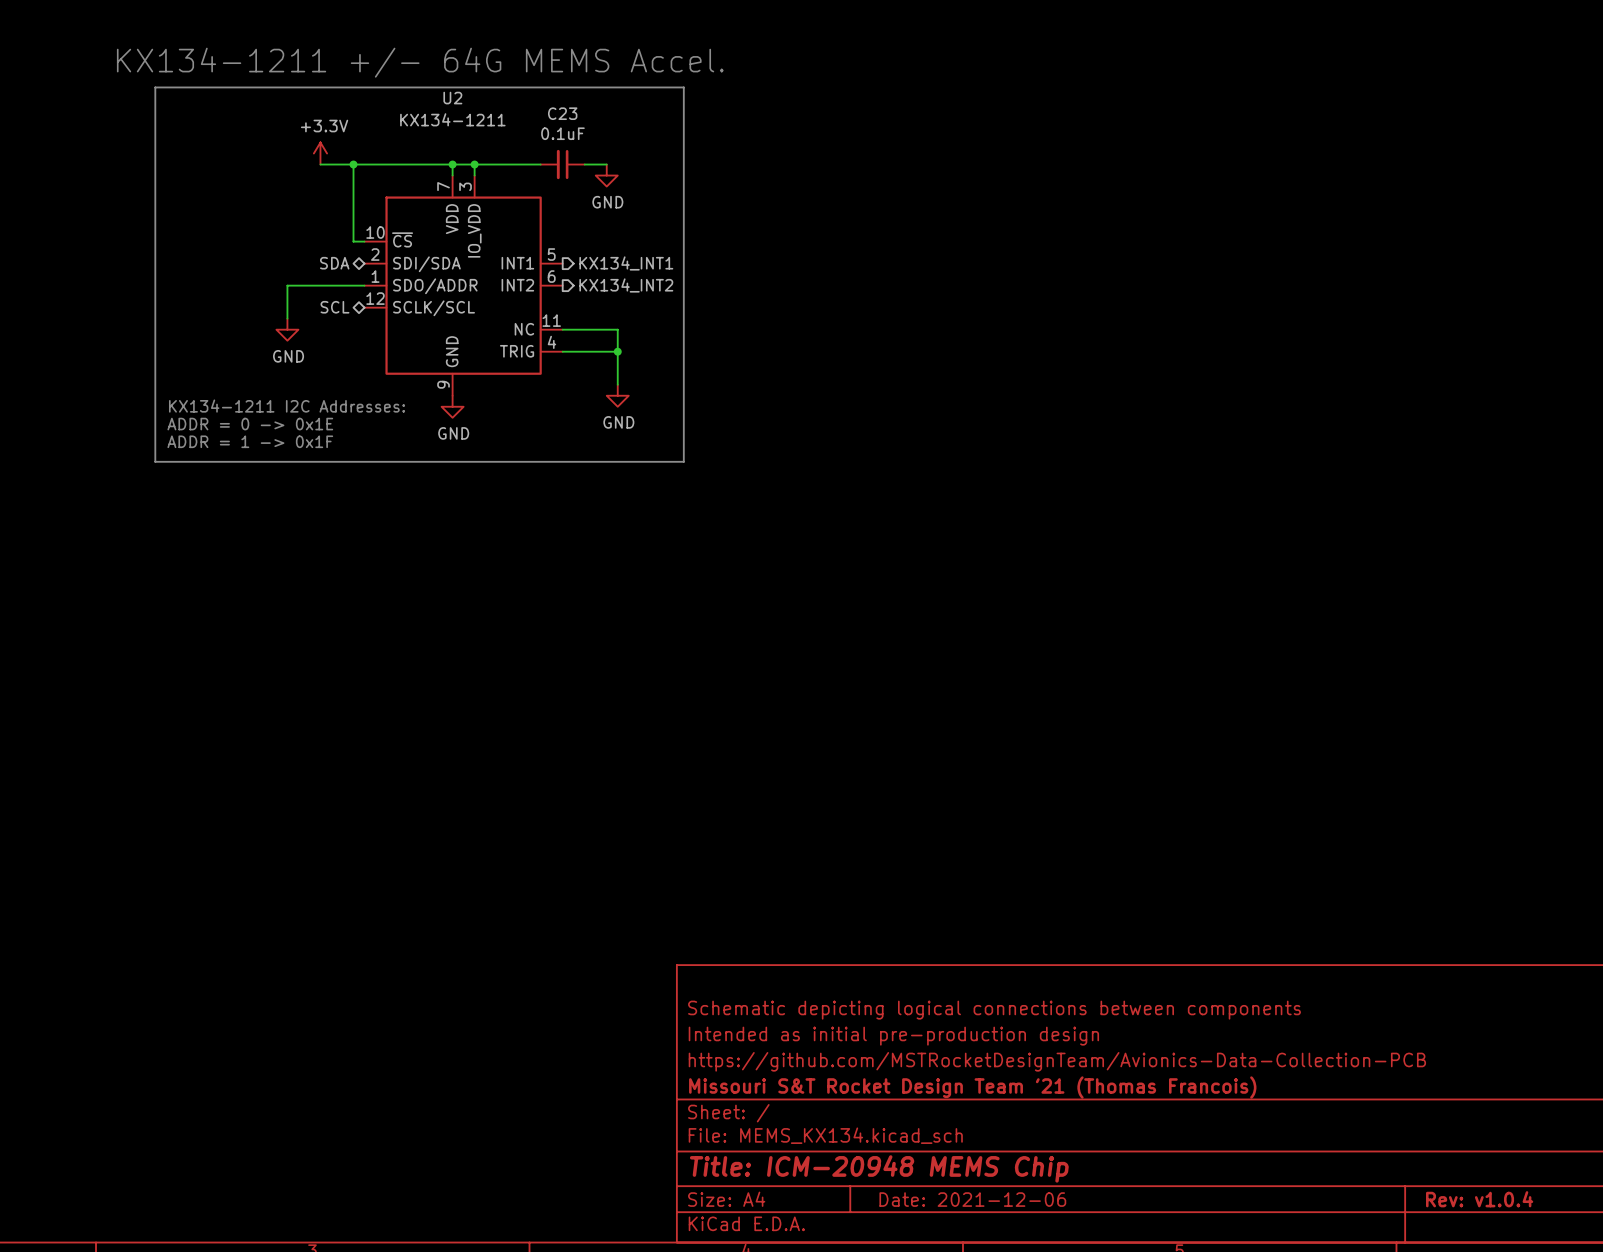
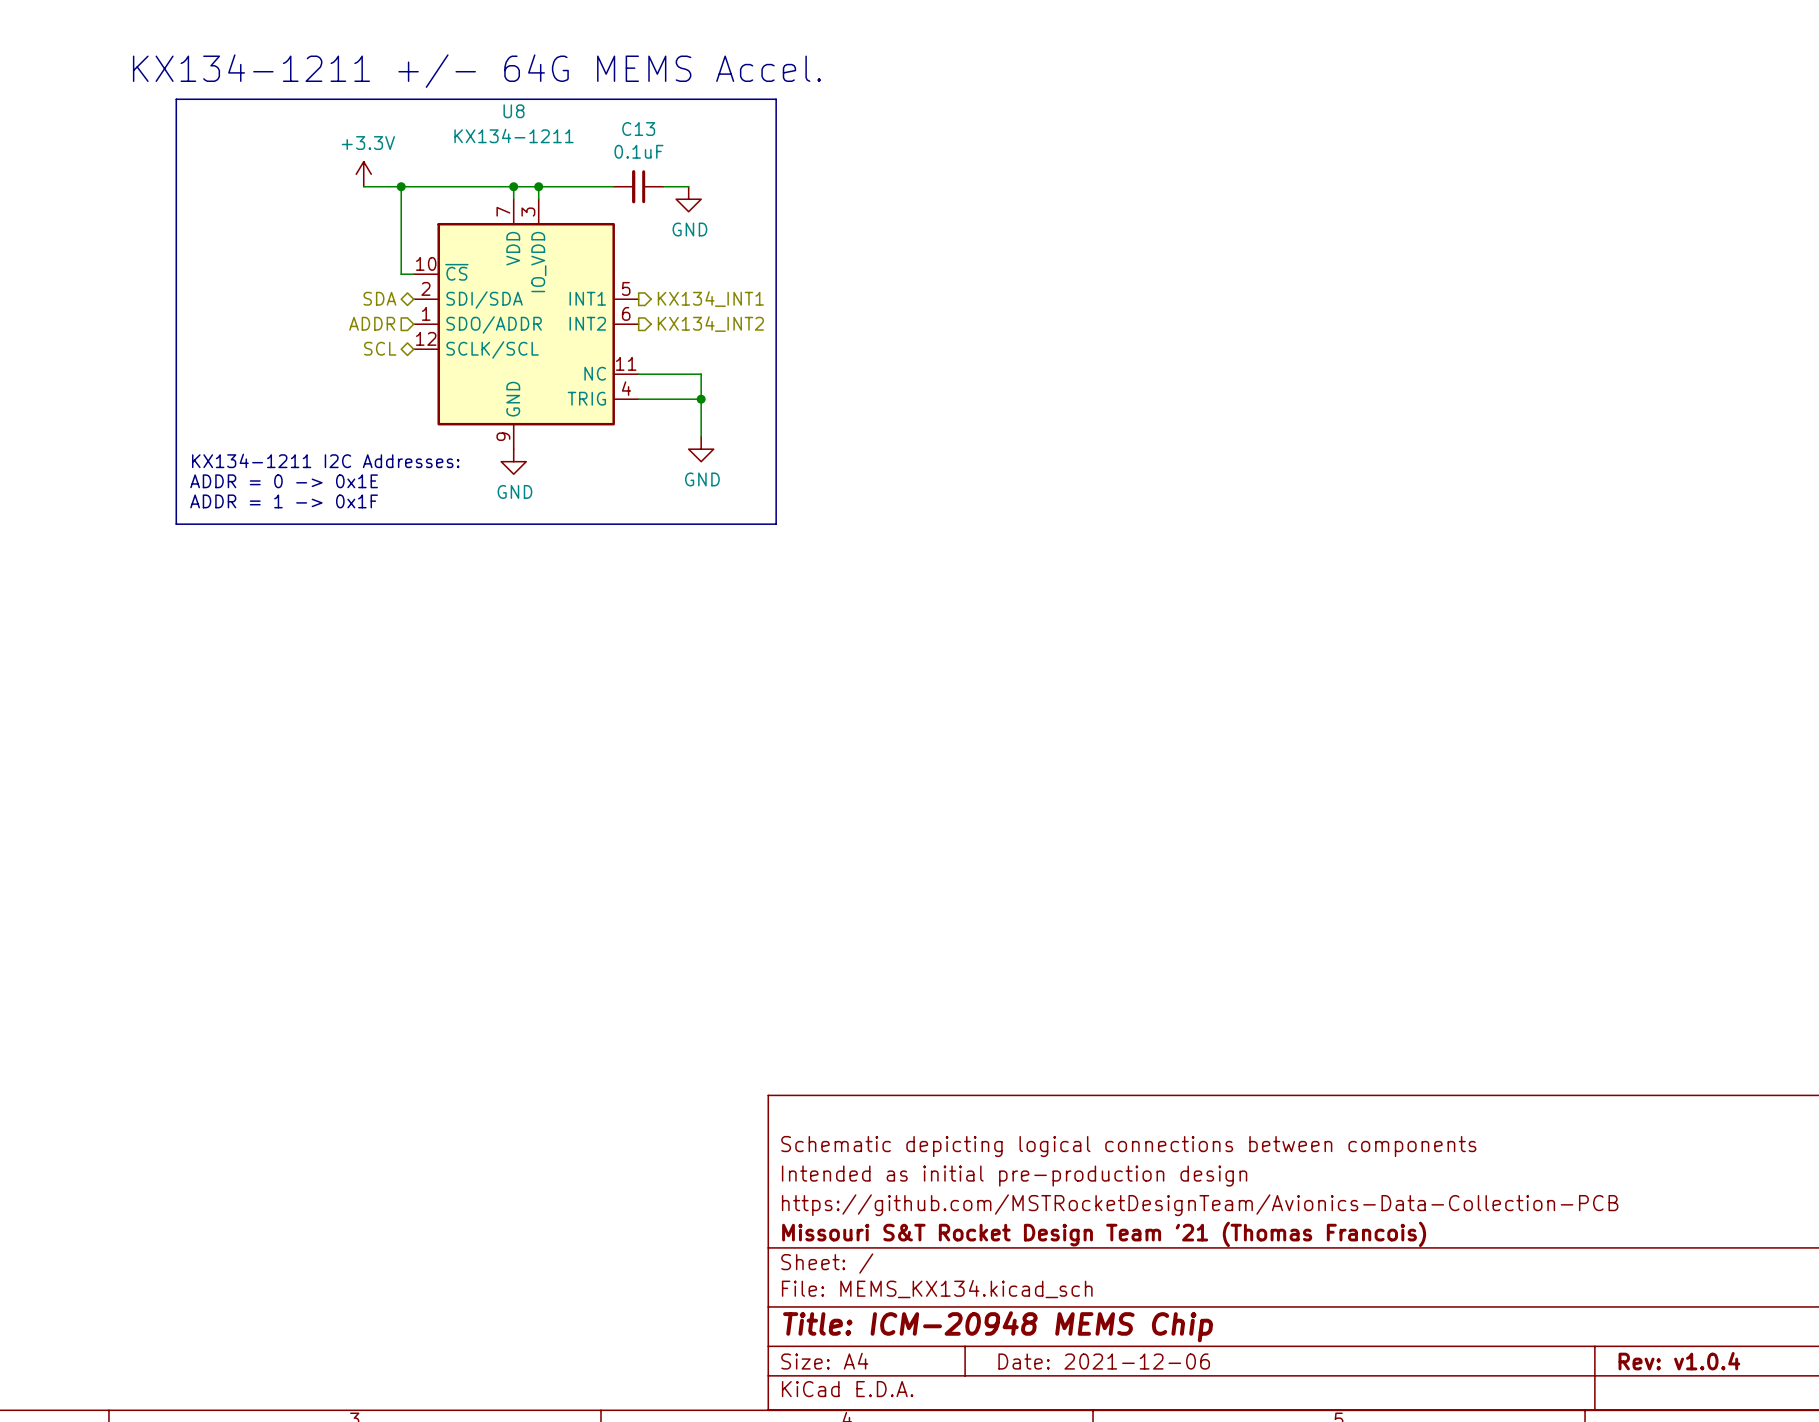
U2 name: U2 (452, 98) -> U8 (514, 111)
C23 name: C23 (562, 113) -> C13 (638, 129)
hierarchical label: none -> ADDR (372, 323)
wire: (364, 285) (287, 285) (287, 318) -> none
power symbol: GND (287, 329) -> none

